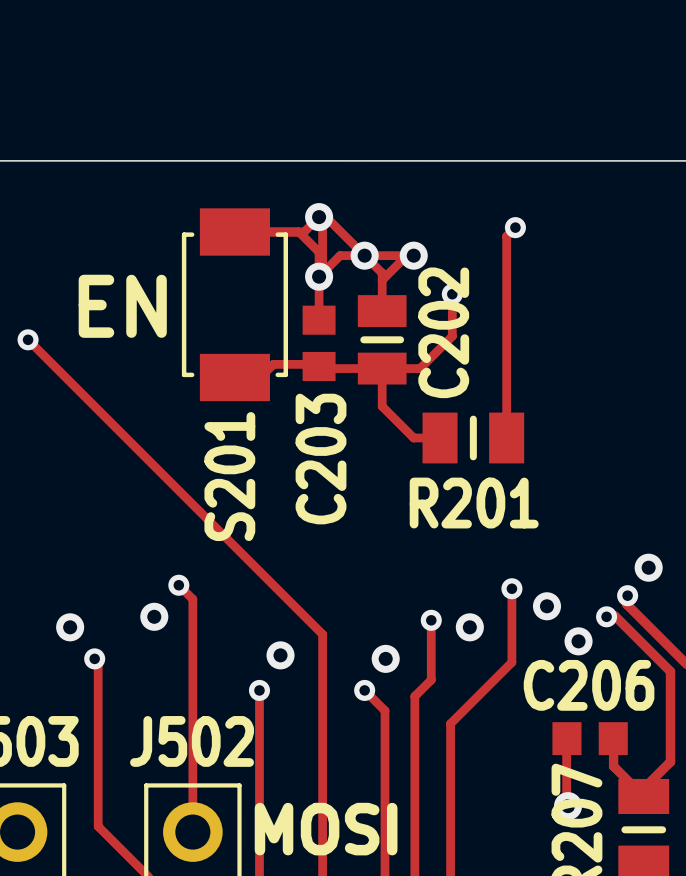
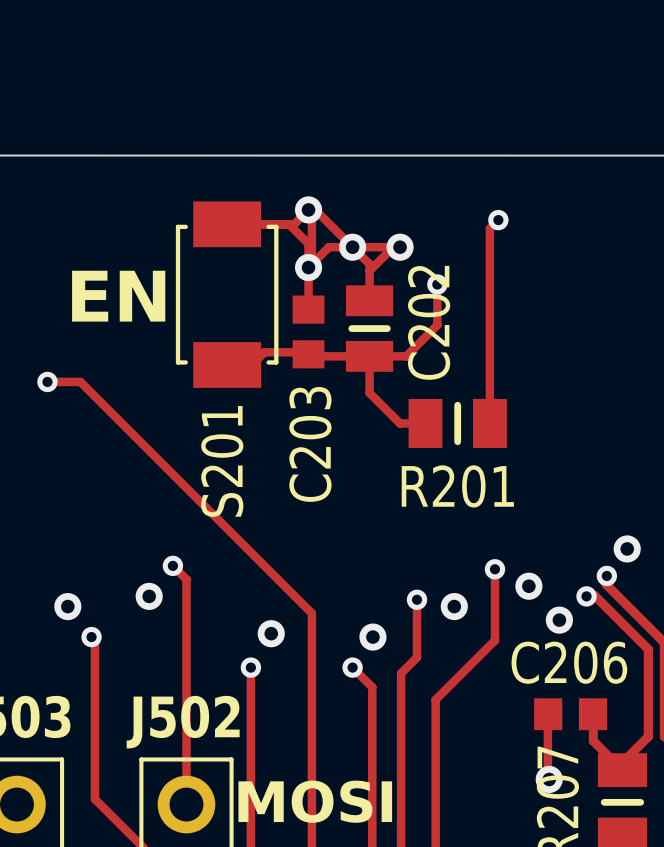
track: (28, 339) (83, 395) -> (47, 381) (80, 381)
via position: (28, 339) -> (47, 381)

